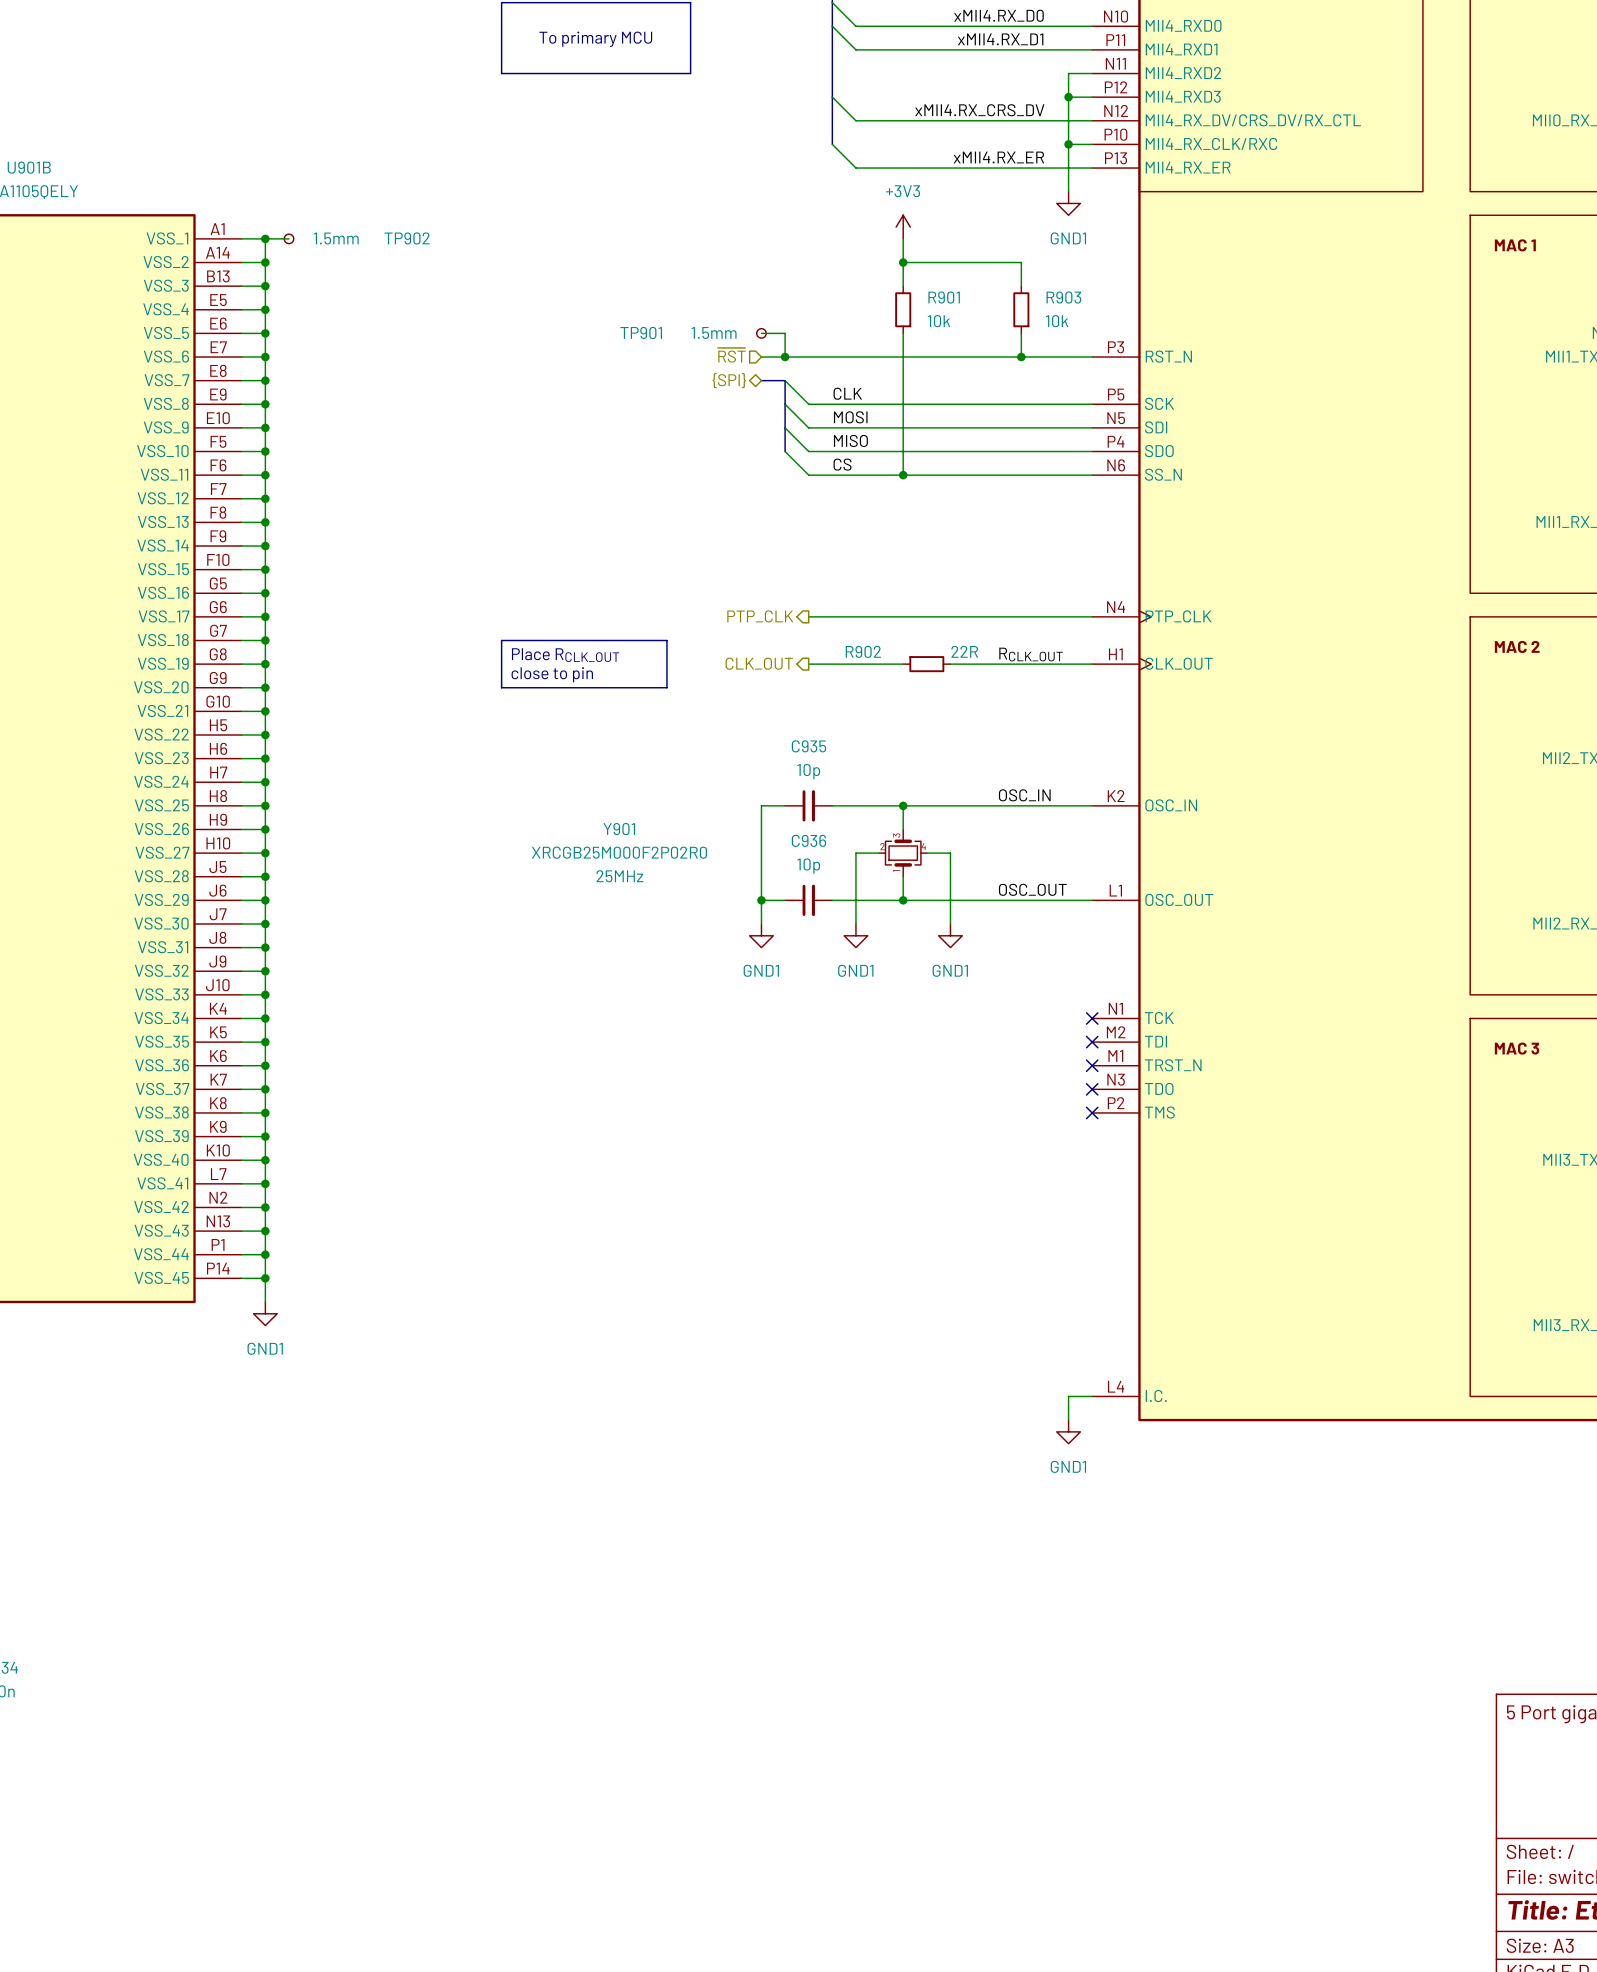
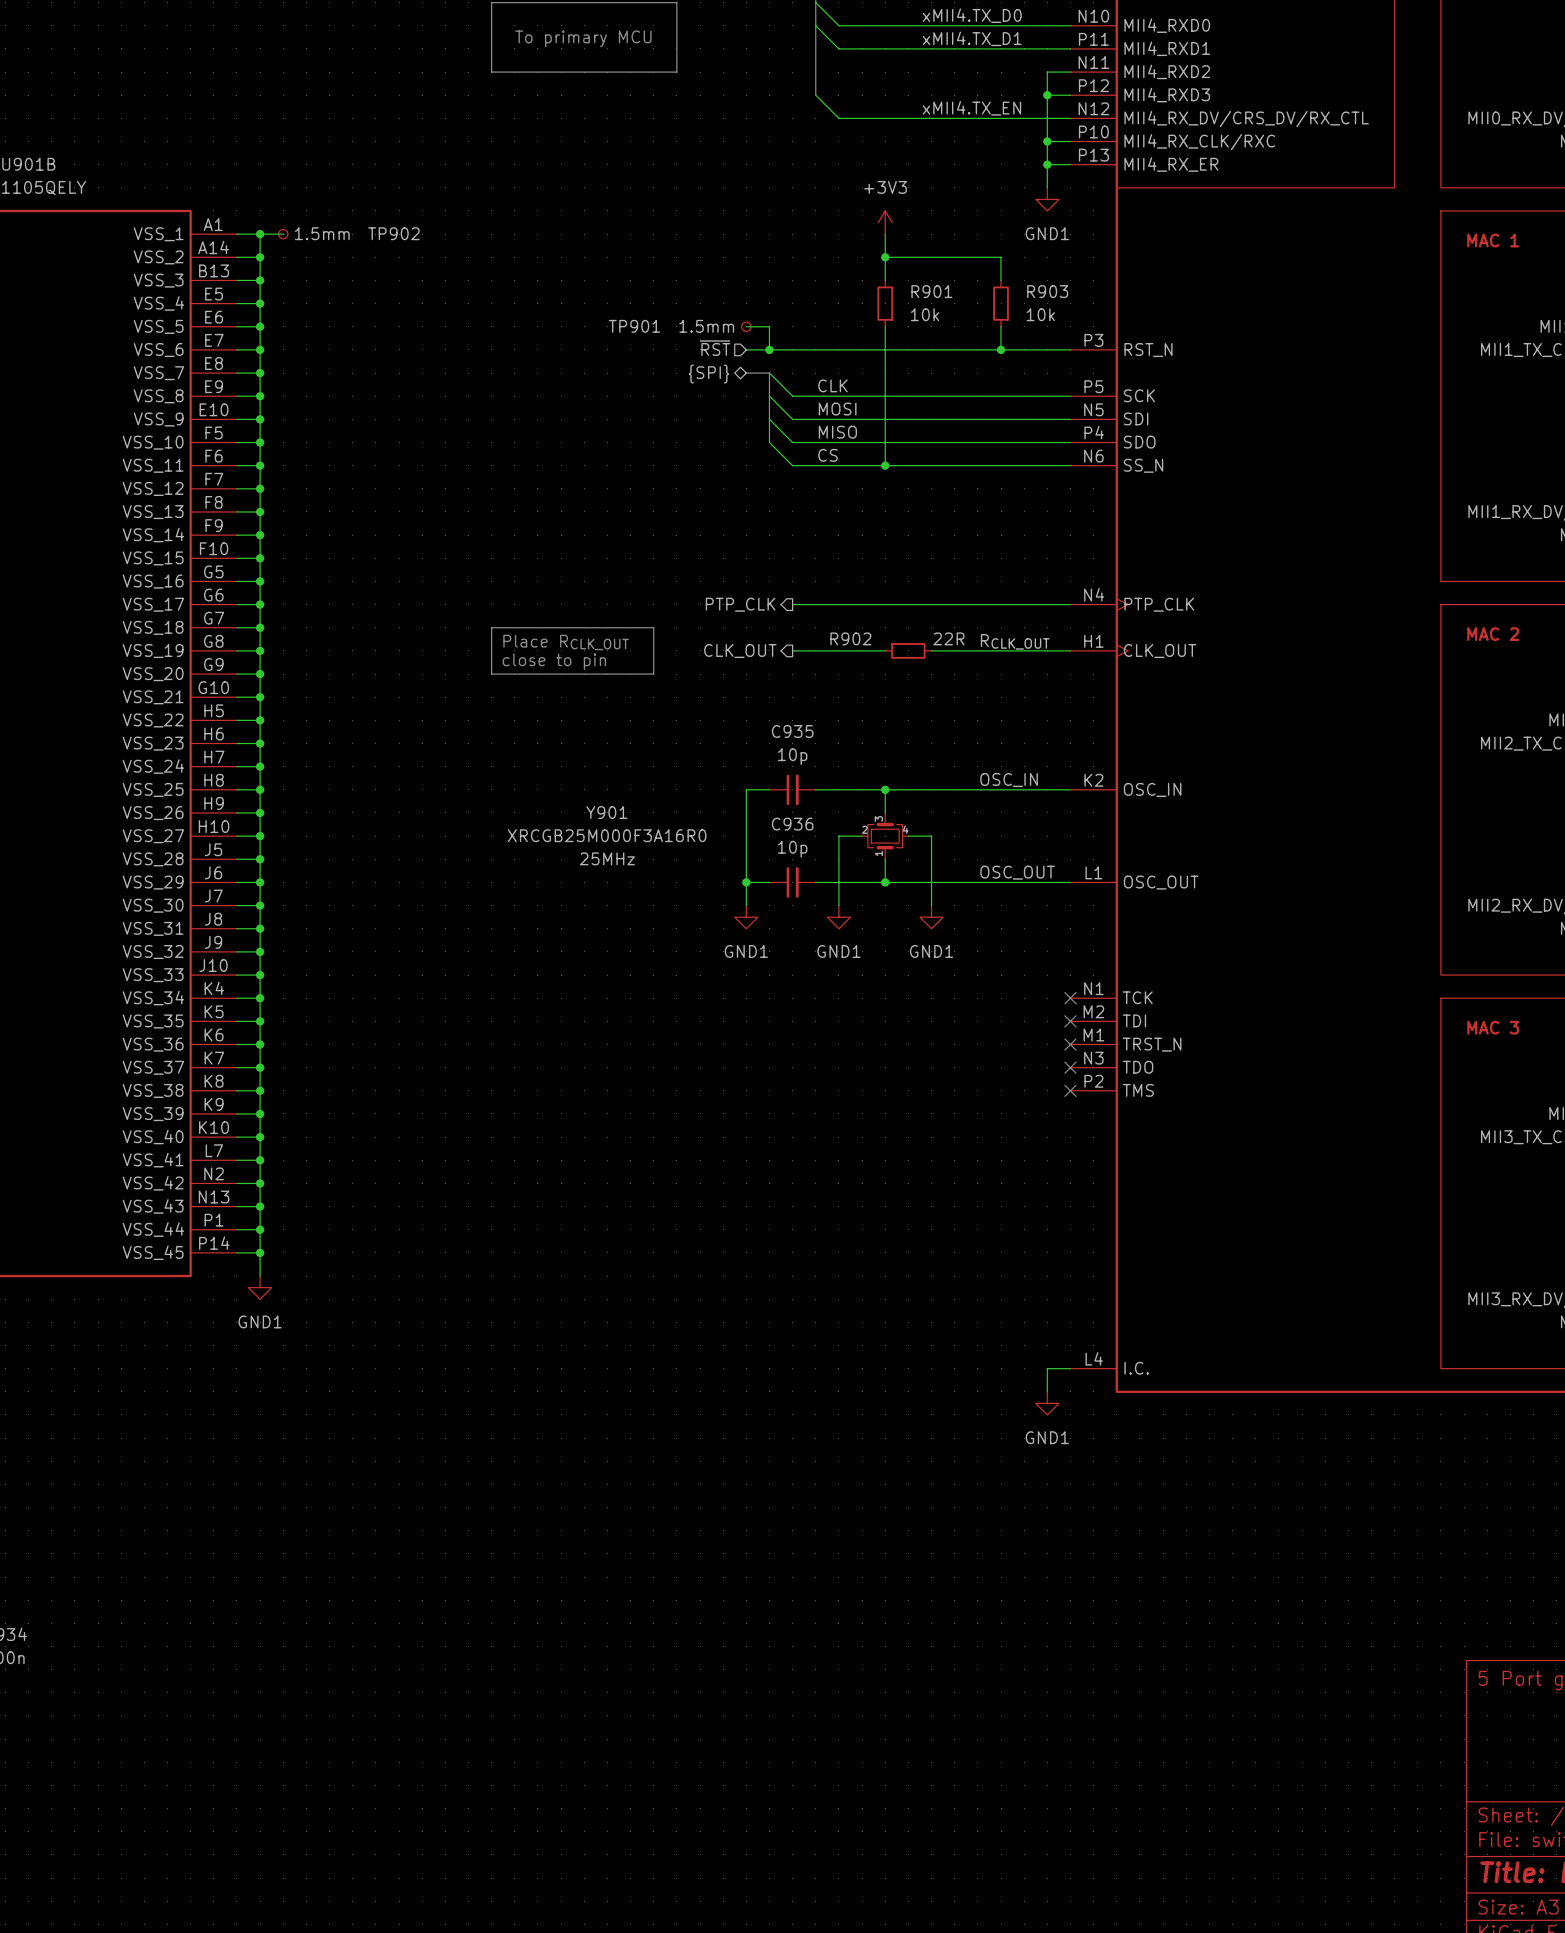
label: xMII4.RX_D0 (998, 15) -> xMII4.TX_D0 (972, 15)
label: xMII4.RX_D1 (1000, 39) -> xMII4.TX_D1 (972, 38)
bus: (832, 97) (832, 144) -> none
label: xMII4.RX_CRS_DV (979, 110) -> xMII4.TX_EN (971, 108)
wire: (832, 144) (855, 168) (1068, 168) -> none
label: xMII4.RX_ER (998, 157) -> none
junction: none -> (1047, 164)
Y901 value: XRCGB25M000F2P02R0 (619, 852) -> XRCGB25M000F3A16R0 (607, 835)

